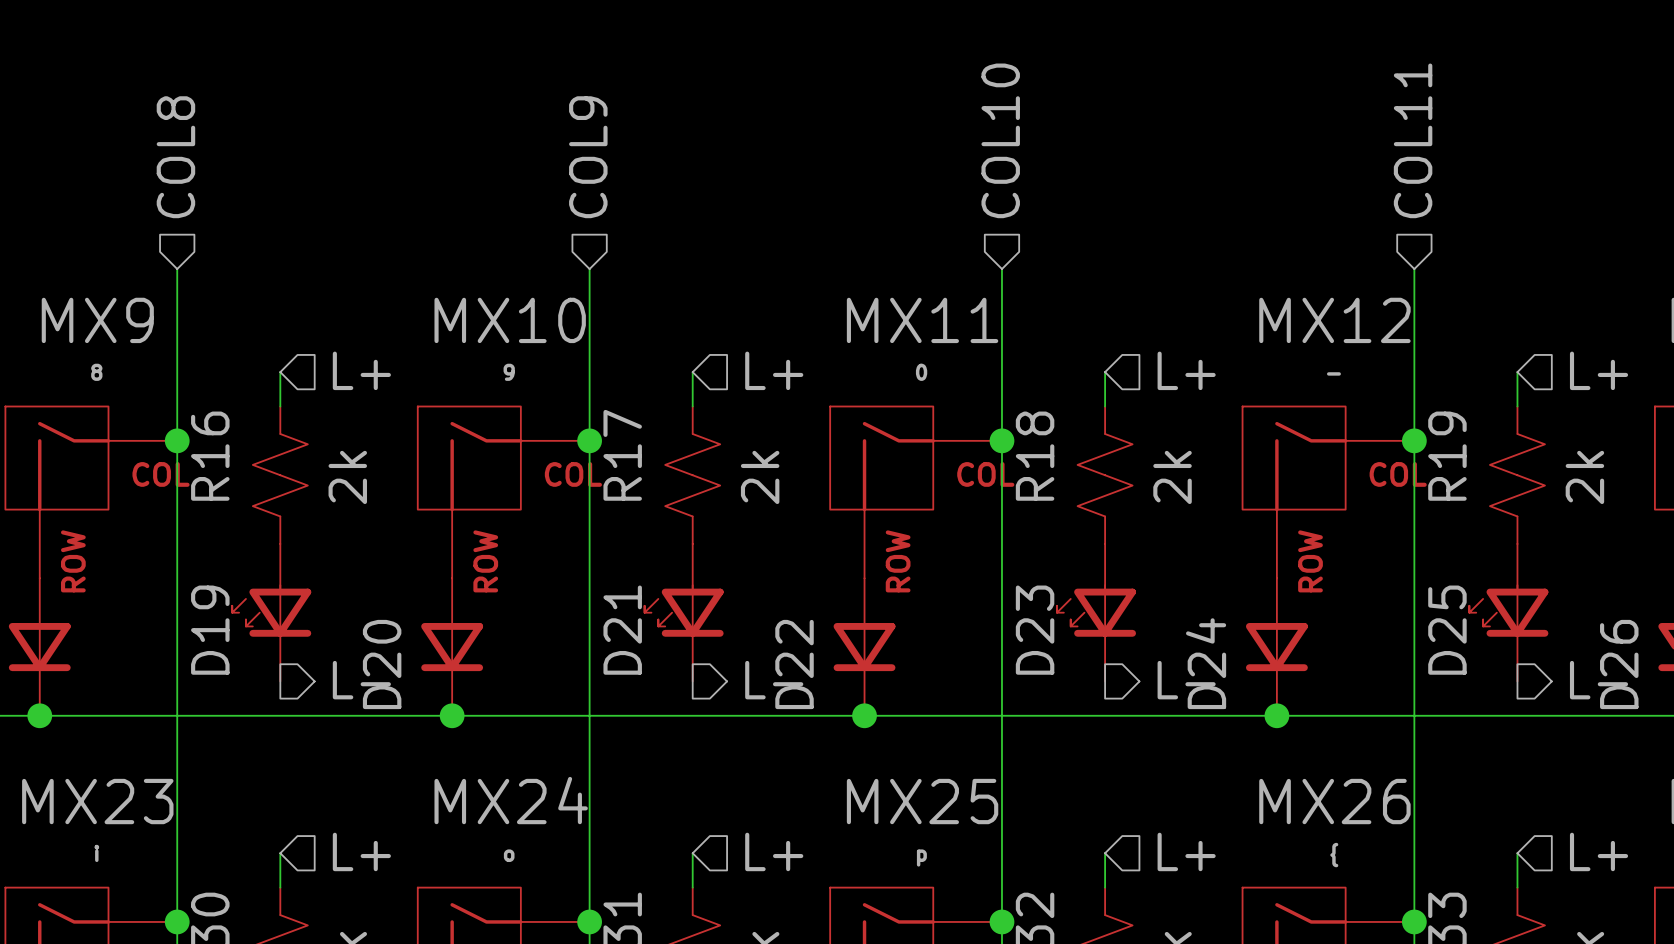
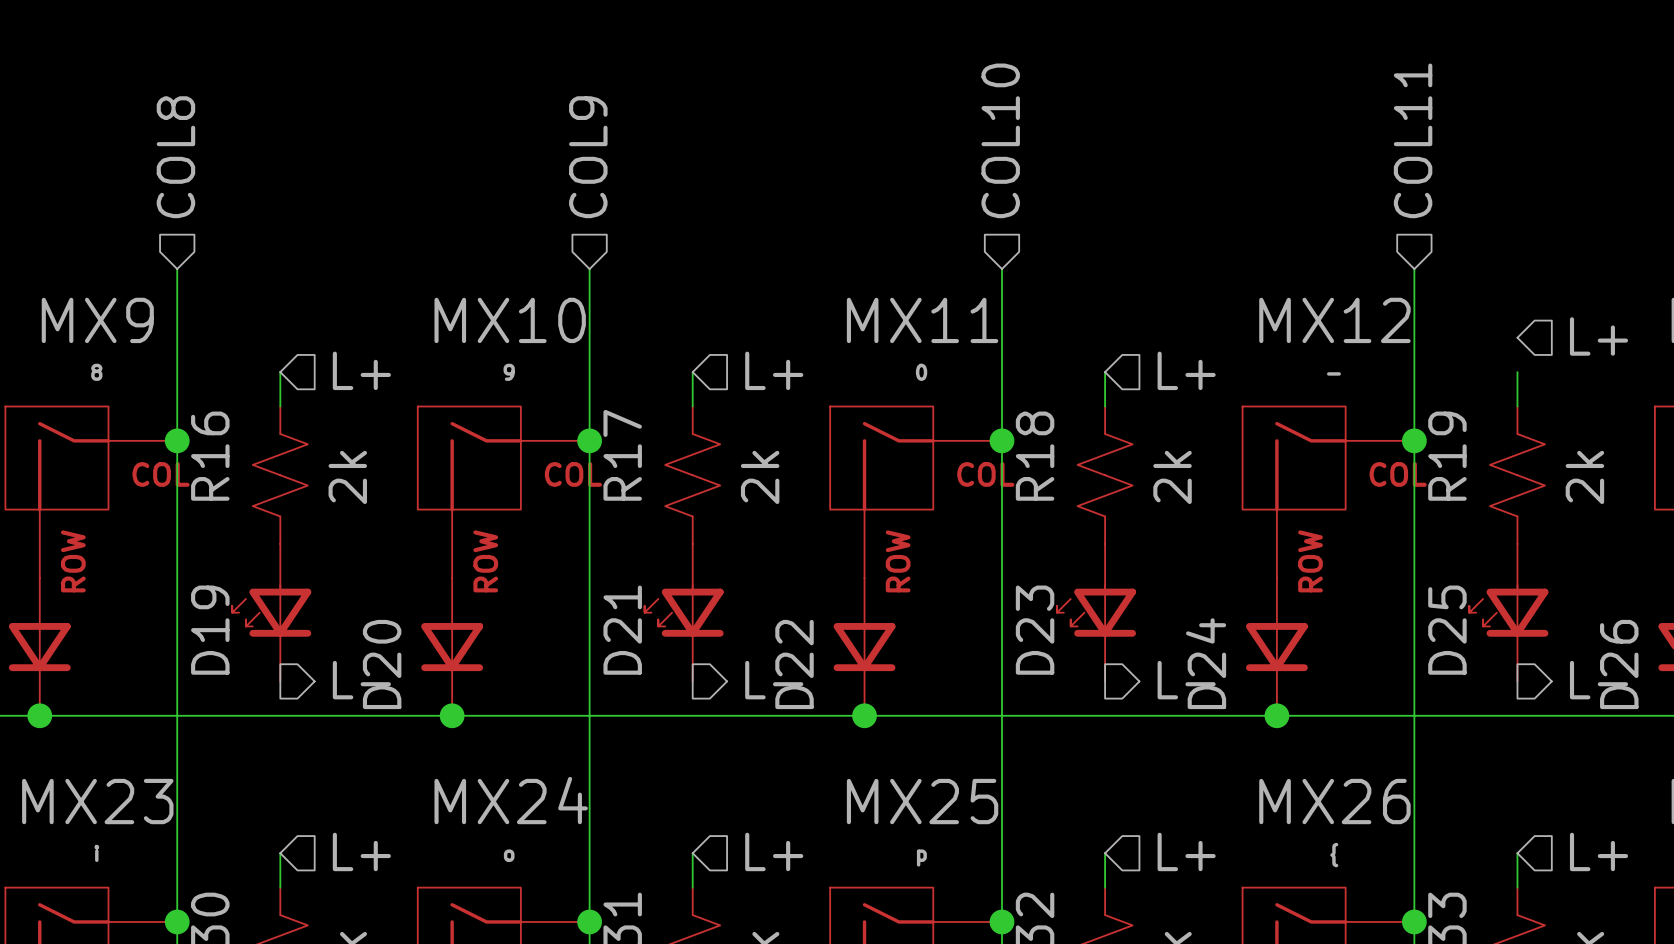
hierarchical label position: L+ (1599, 370) -> L+ (1599, 336)

